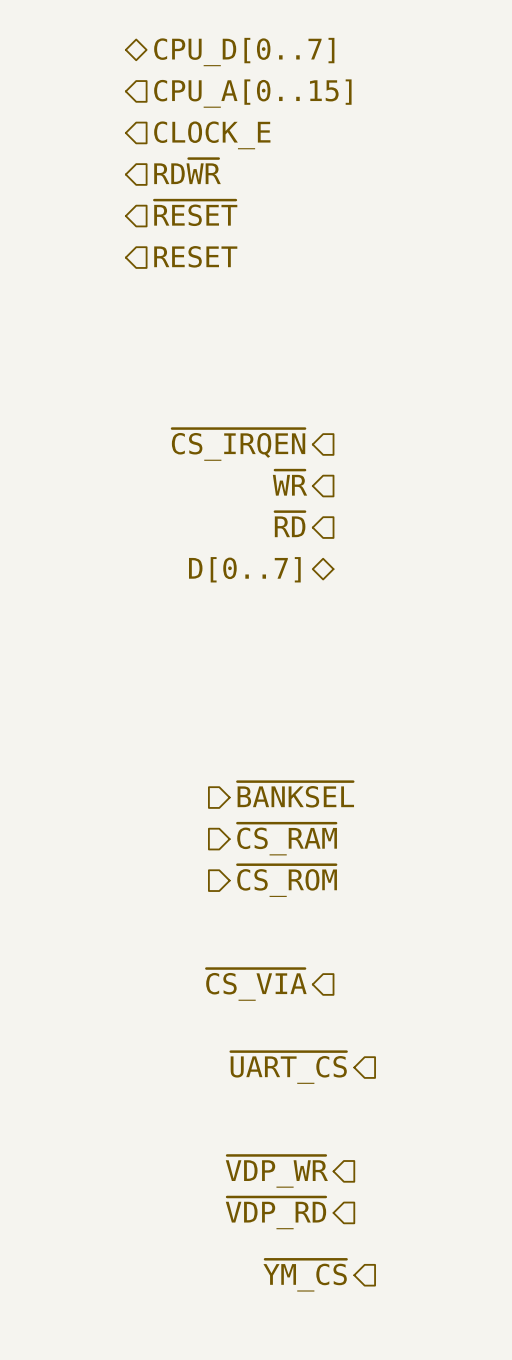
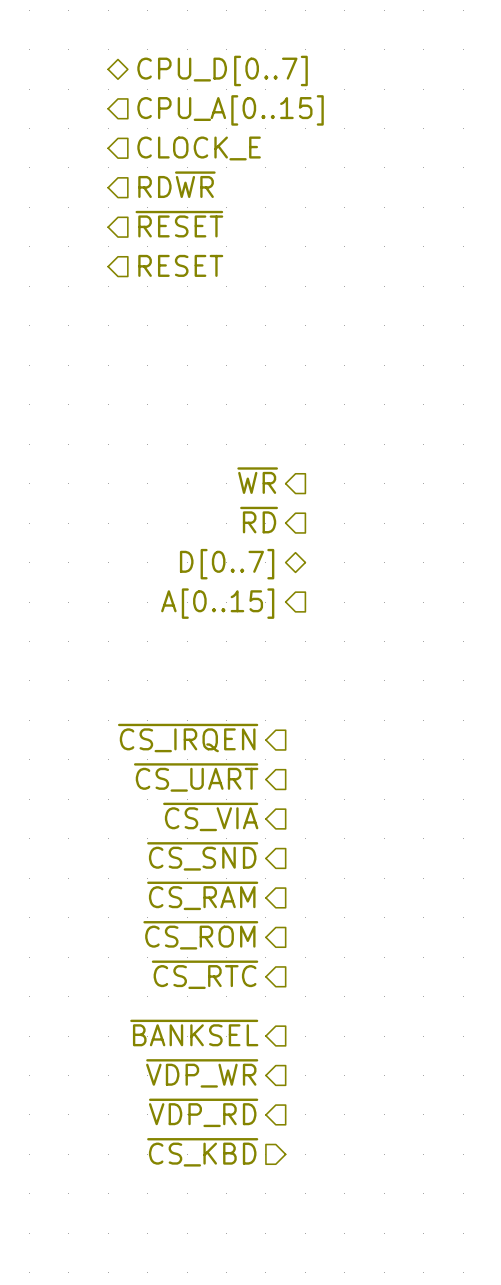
hierarchical label position: ~{CS_IRQEN} (238, 444) -> ~{CS_IRQEN} (188, 738)
hierarchical label: none -> A[0..15] (217, 603)
hierarchical label rotation: 0° (295, 794) -> 180° (194, 1033)
hierarchical label position: ~{BANKSEL} (295, 794) -> ~{BANKSEL} (194, 1033)
hierarchical label: none -> ~{CS_UART} (196, 777)
hierarchical label rotation: 0° (287, 839) -> 180° (202, 895)
hierarchical label: none -> ~{CS_SND} (202, 856)
hierarchical label rotation: 0° (287, 880) -> 180° (200, 935)
hierarchical label position: ~{CS_VIA} (256, 984) -> ~{CS_VIA} (210, 816)
hierarchical label: none -> ~{CS_RTC} (205, 974)
hierarchical label: ~{UART_CS} (288, 1067) -> none
hierarchical label position: ~{VDP_WR} (276, 1171) -> ~{VDP_WR} (202, 1073)
hierarchical label: none -> ~{CS_KBD} (202, 1152)
hierarchical label position: ~{VDP_RD} (275, 1213) -> ~{VDP_RD} (203, 1112)
hierarchical label: ~{YM_CS} (305, 1275) -> none

